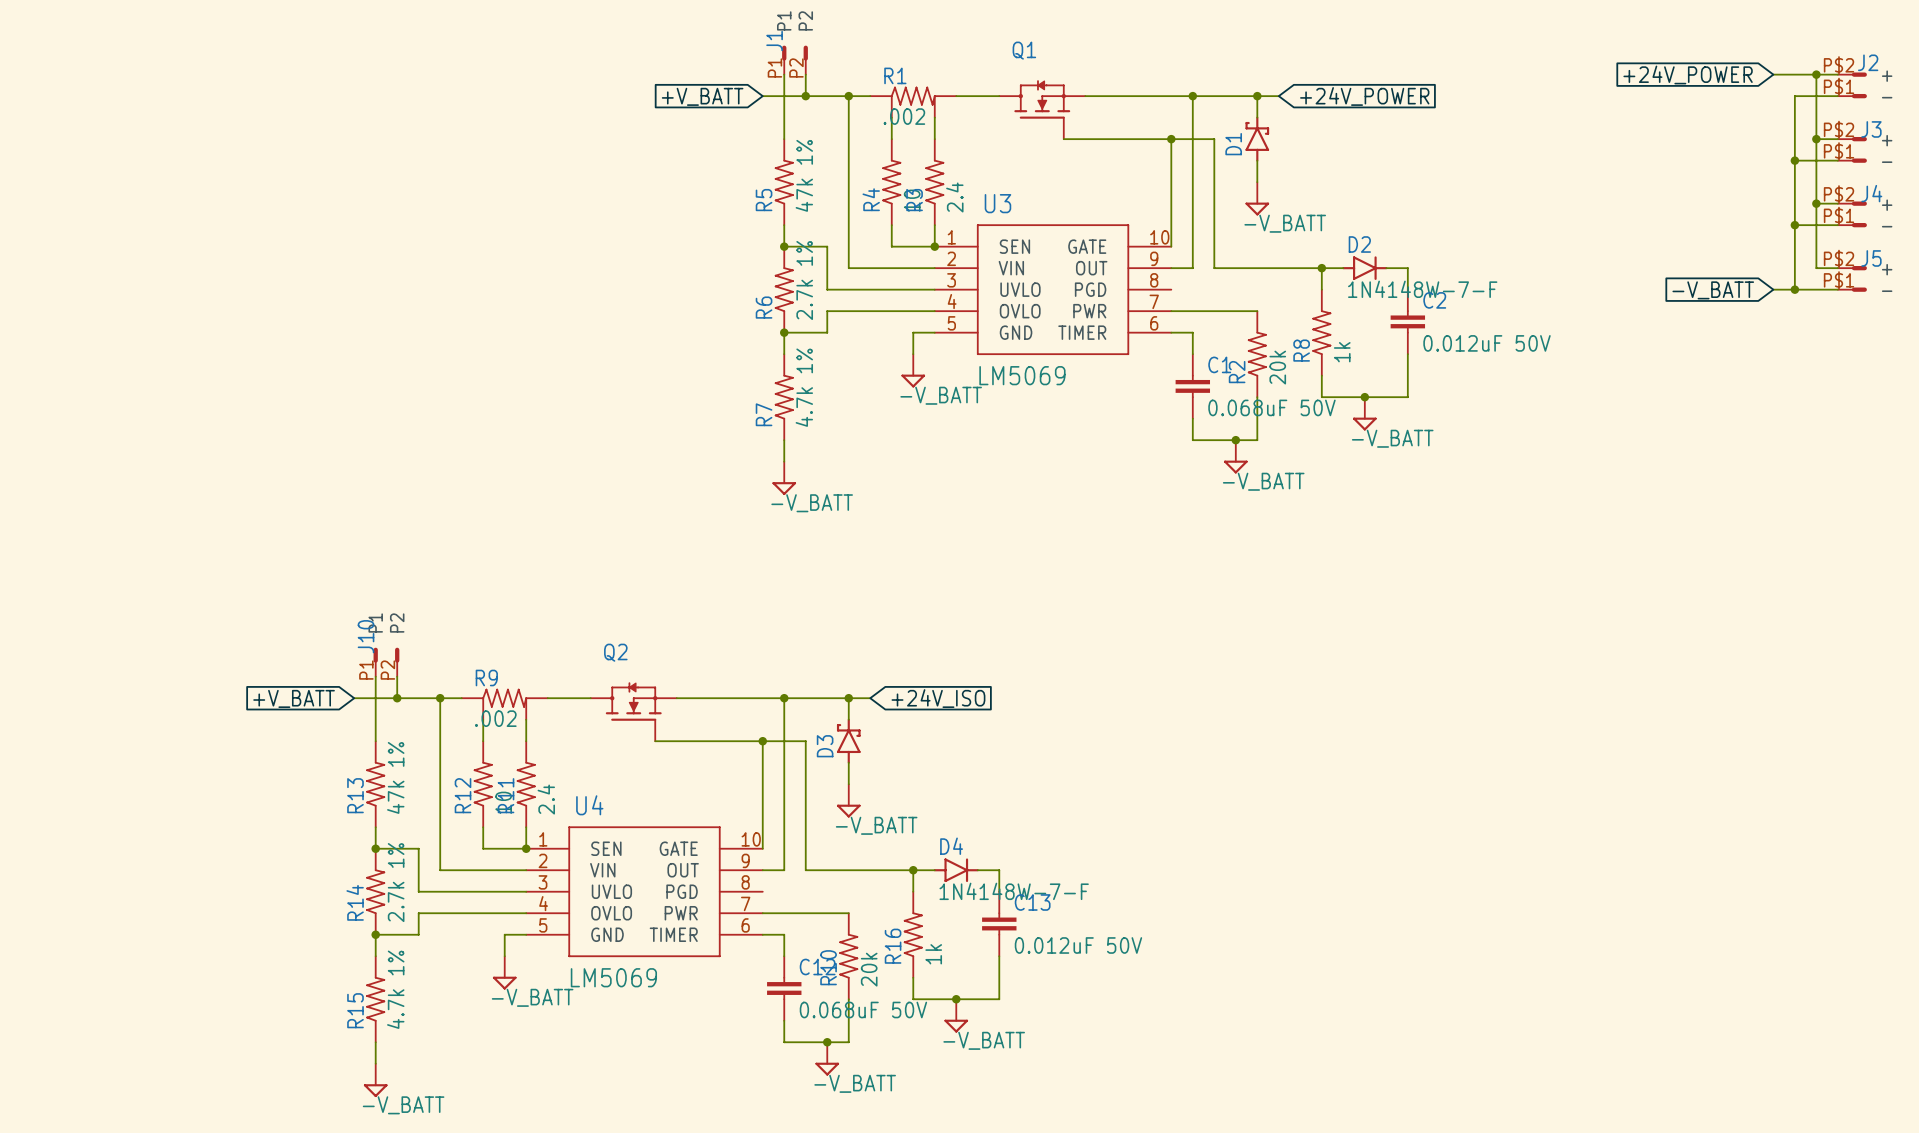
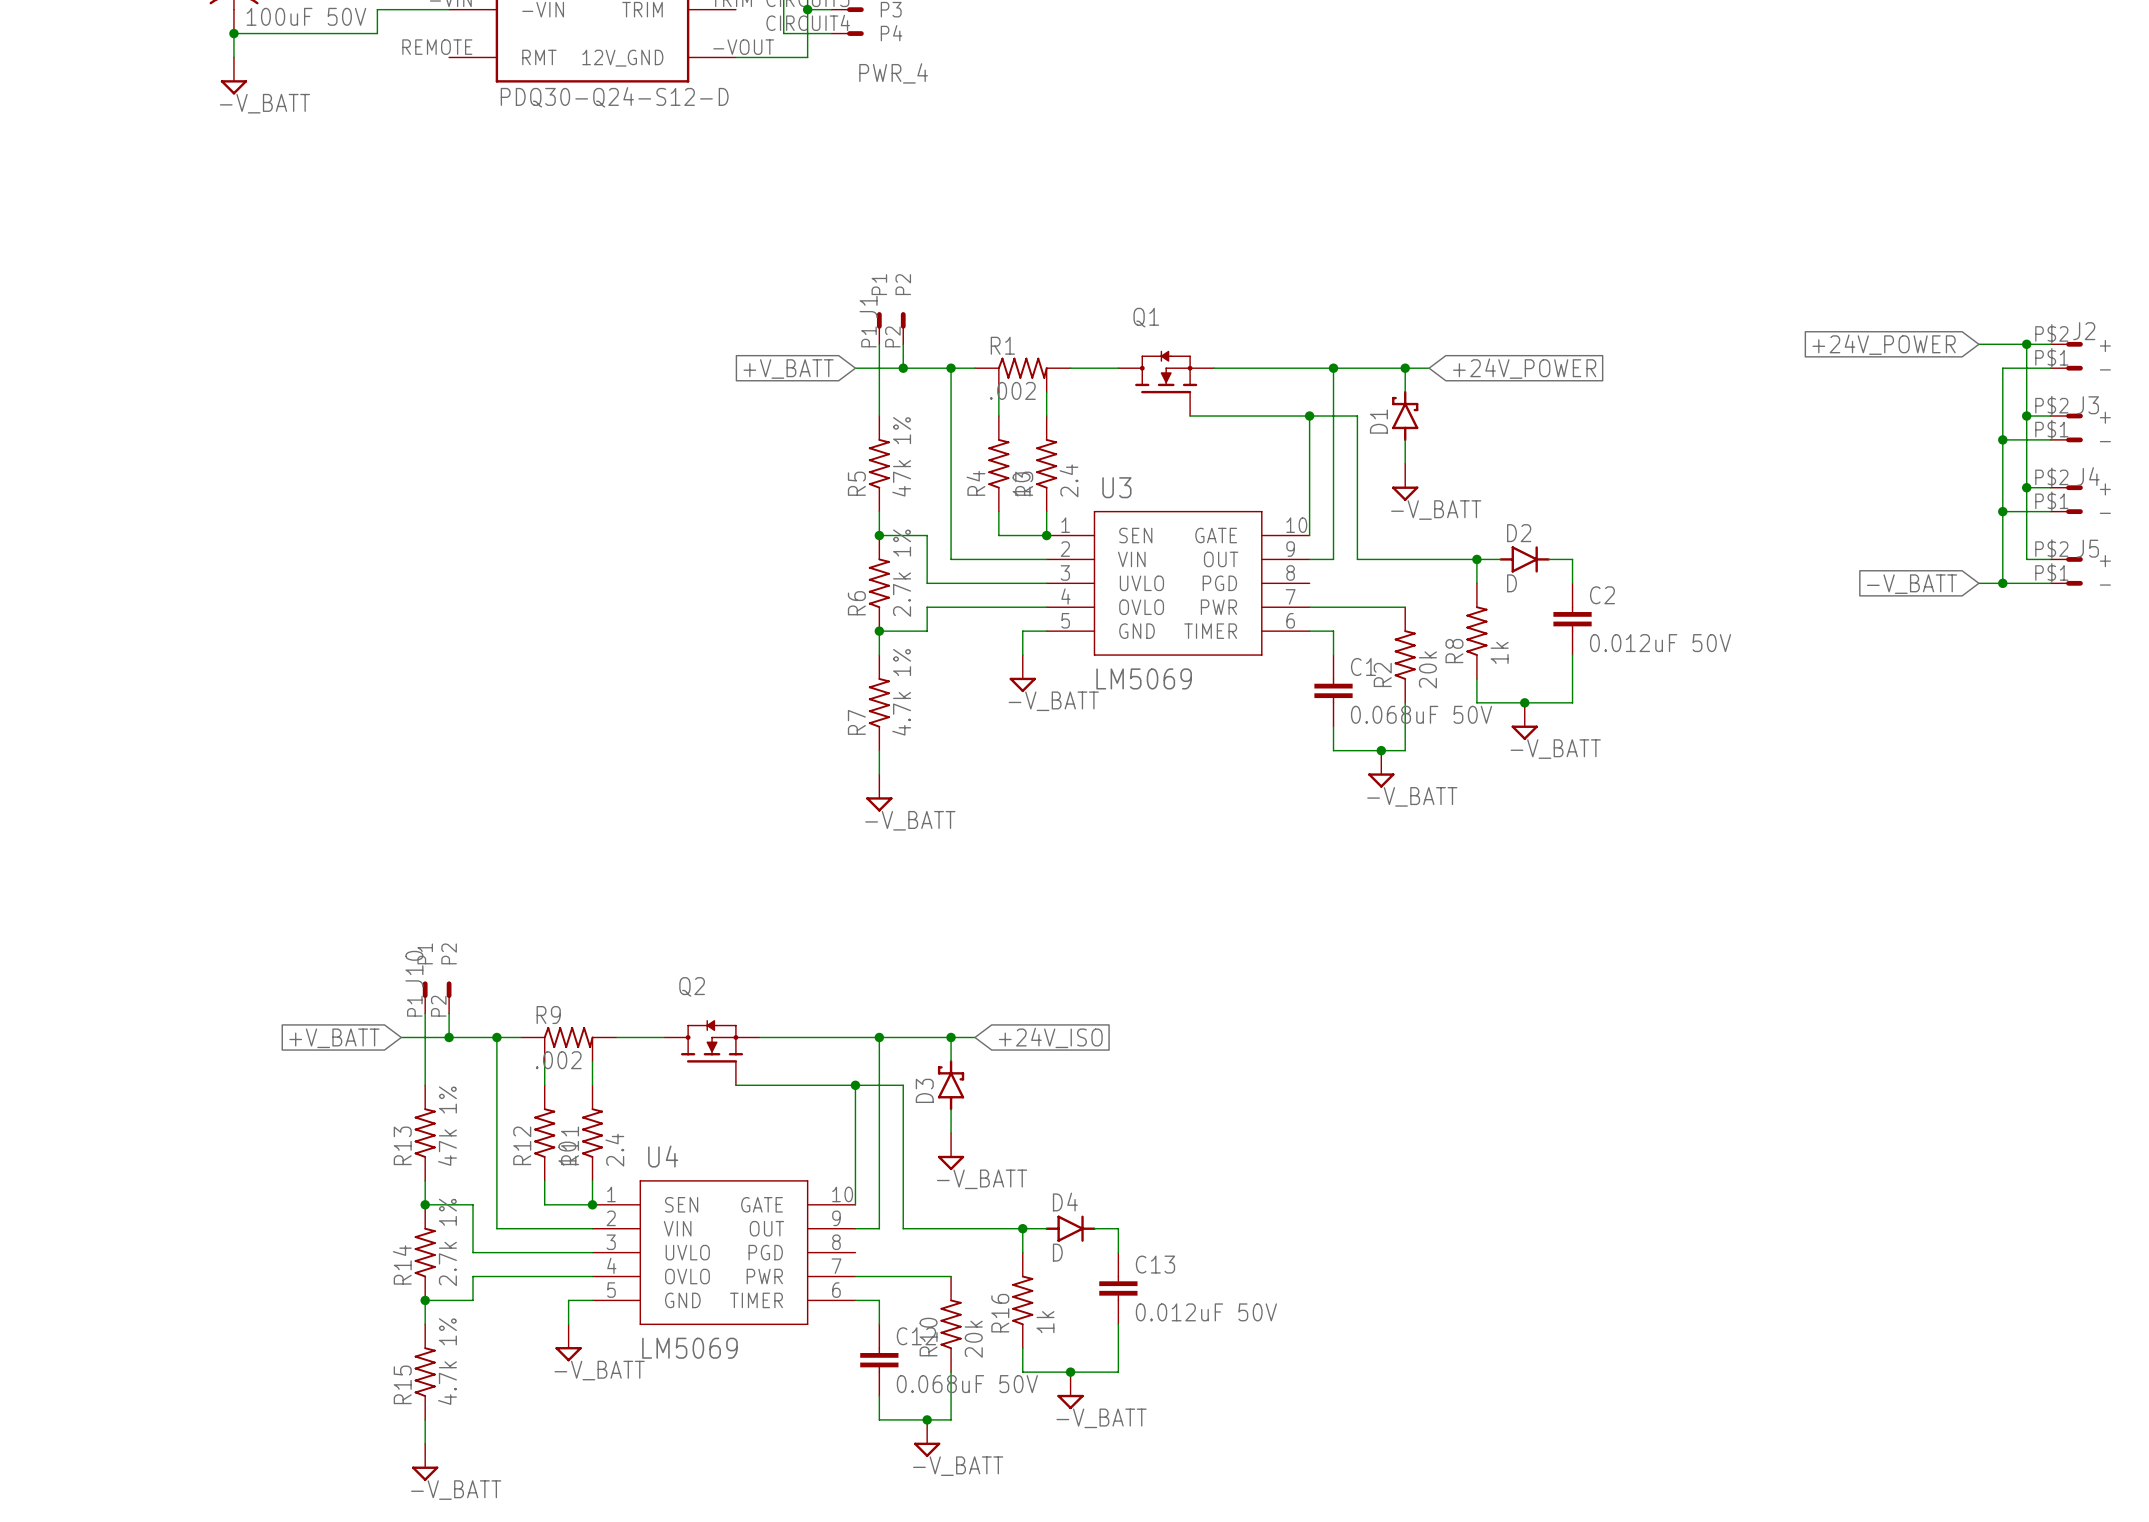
D2 value: 1N4148W-7-F (1422, 289) -> D (1511, 583)
D4 value: 1N4148W-7-F (1014, 891) -> D (1057, 1252)

